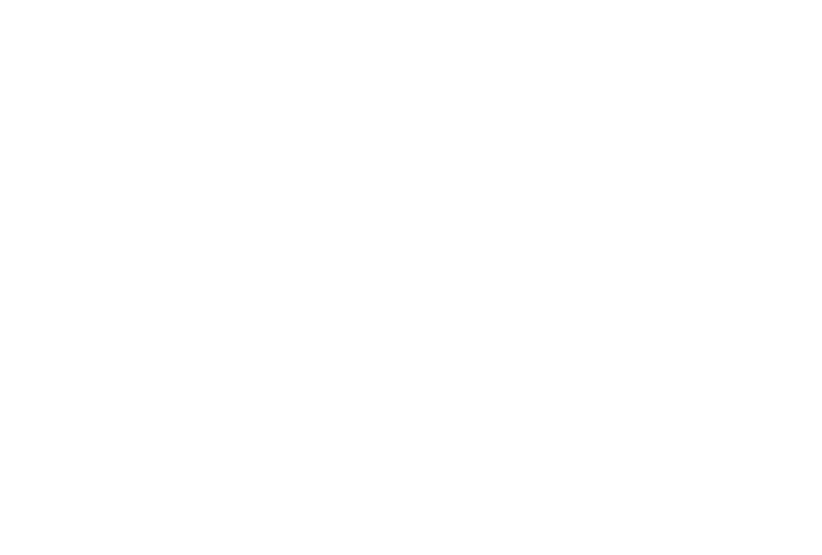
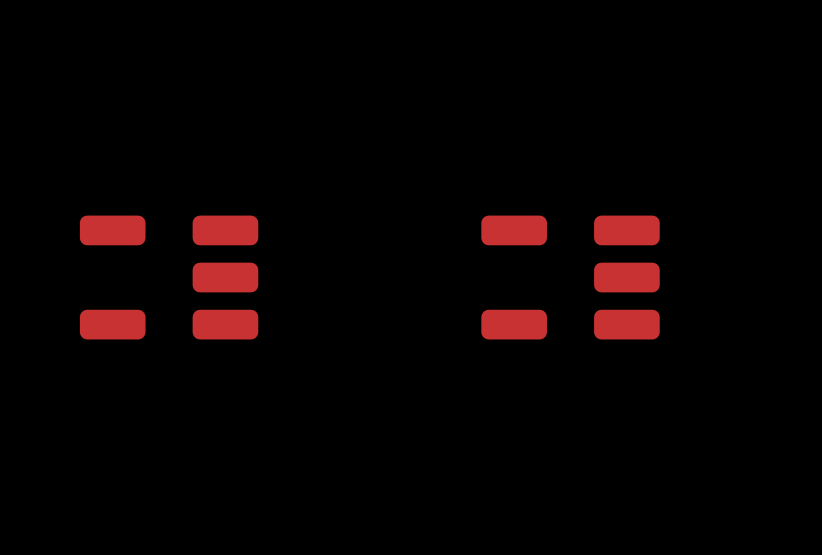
part: none -> (169, 277)
part: none -> (570, 277)

